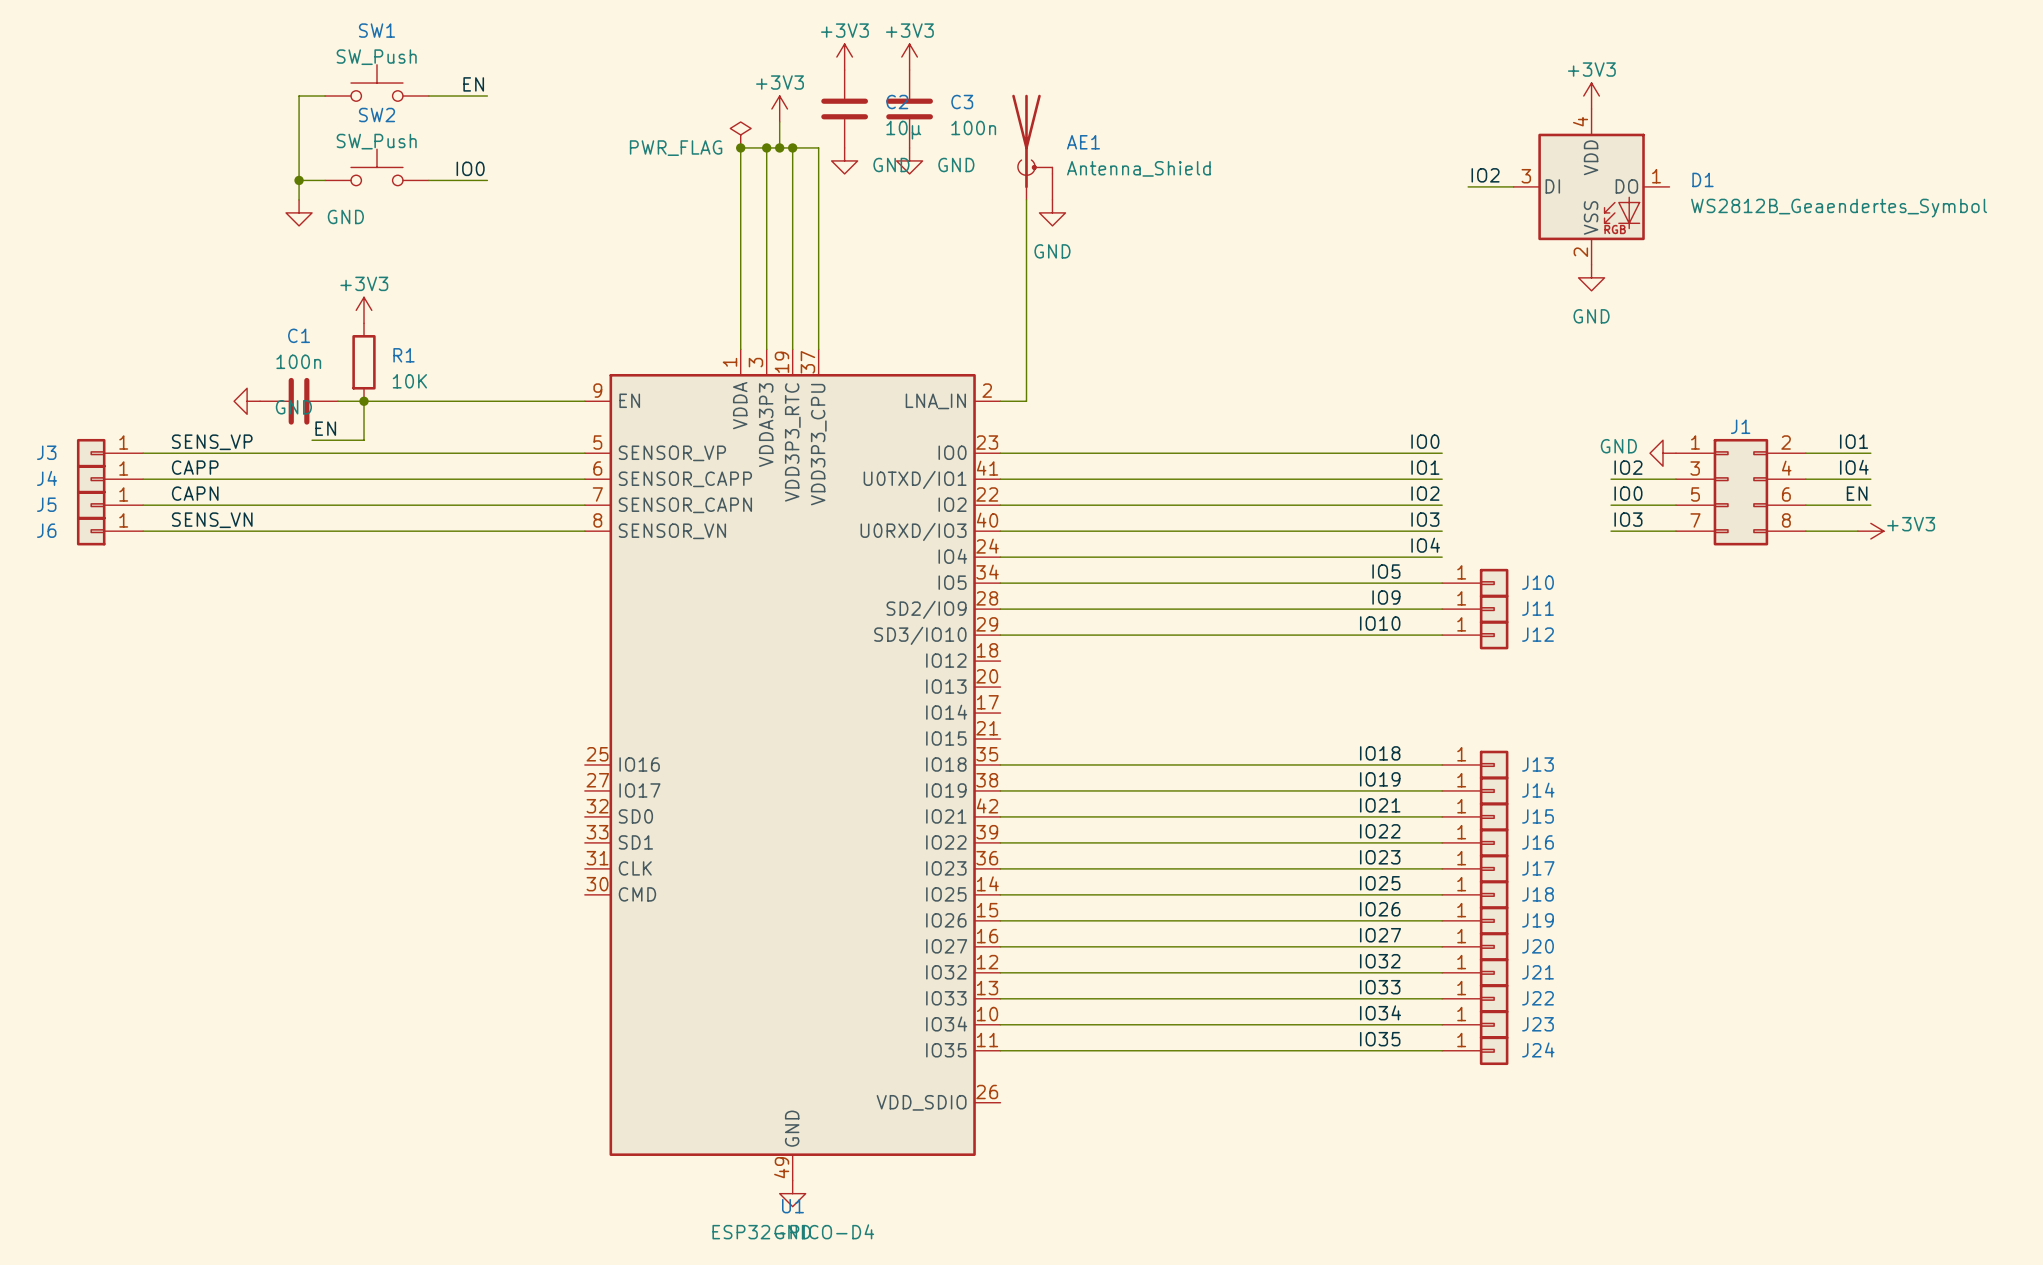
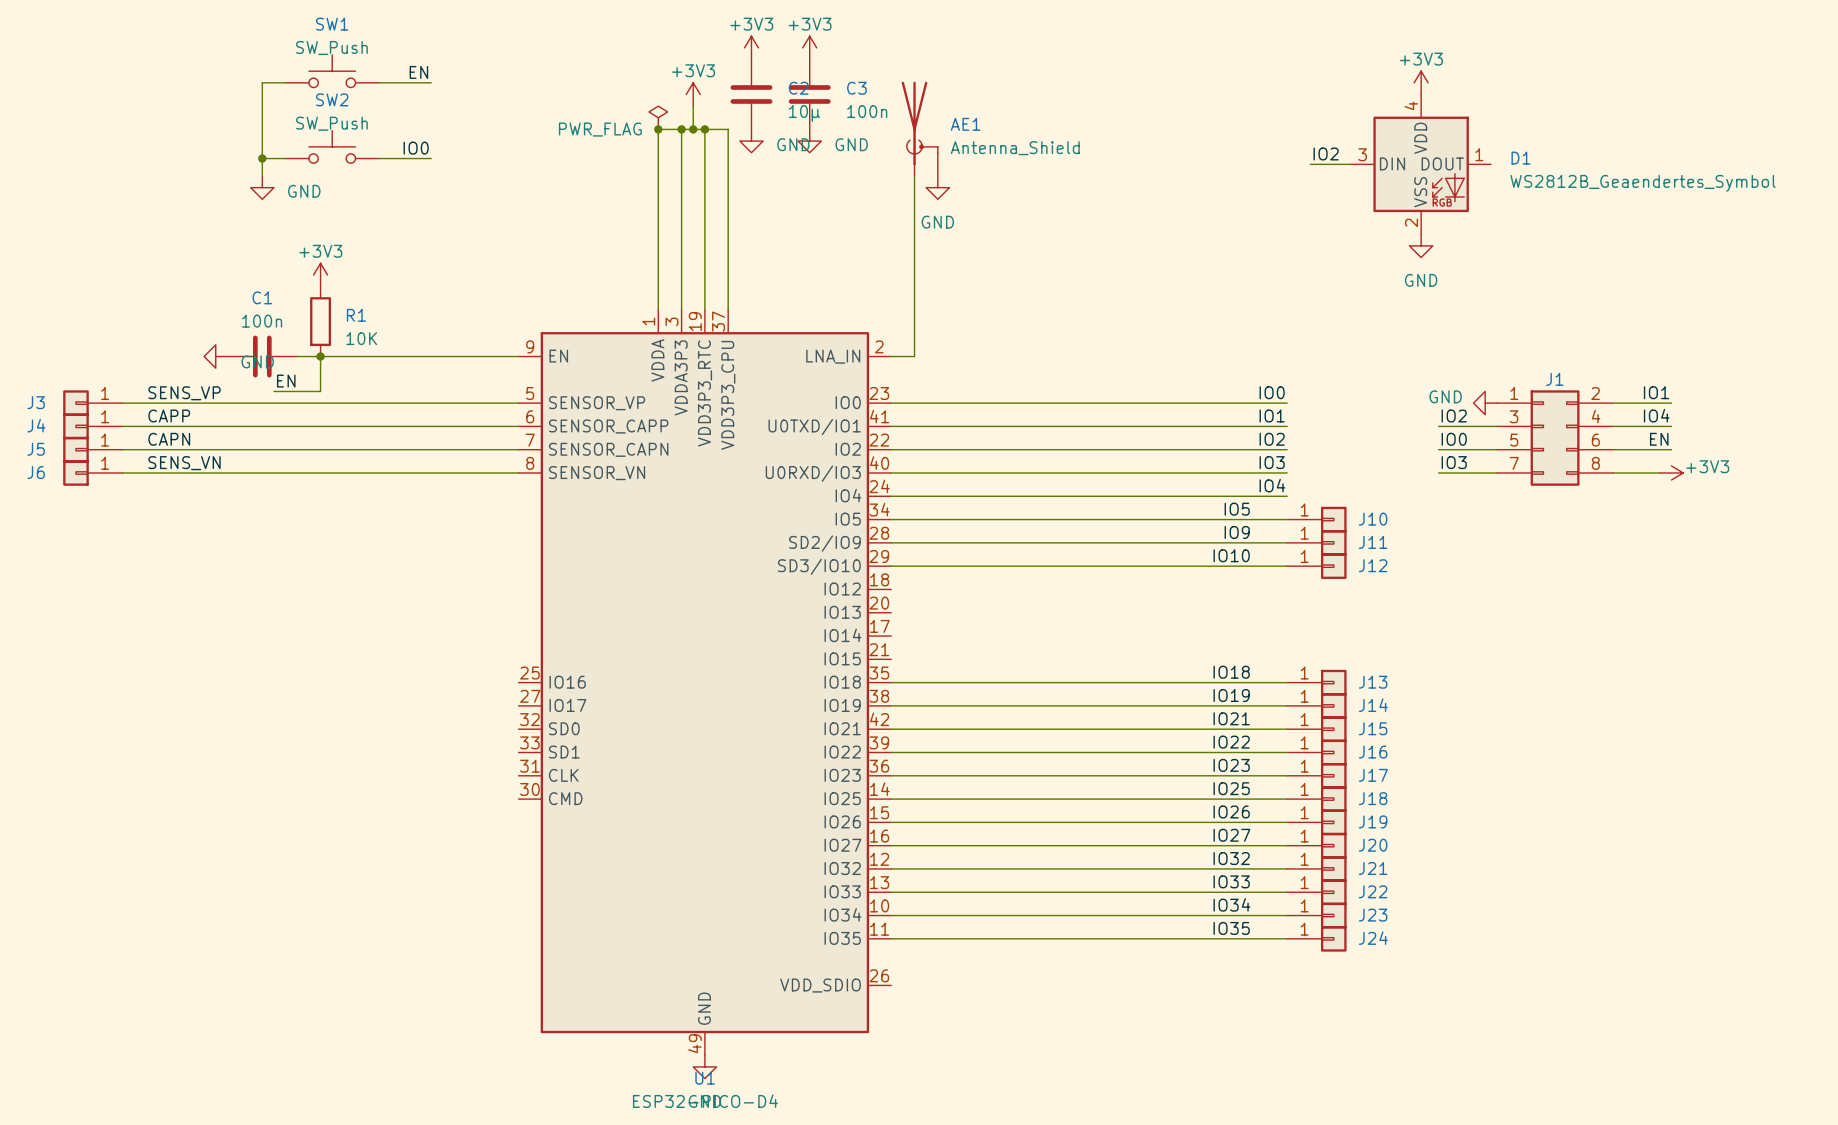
D1 pin name: DI (1552, 186) -> DIN (1392, 163)
D1 pin name: DO (1626, 186) -> DOUT (1442, 163)

